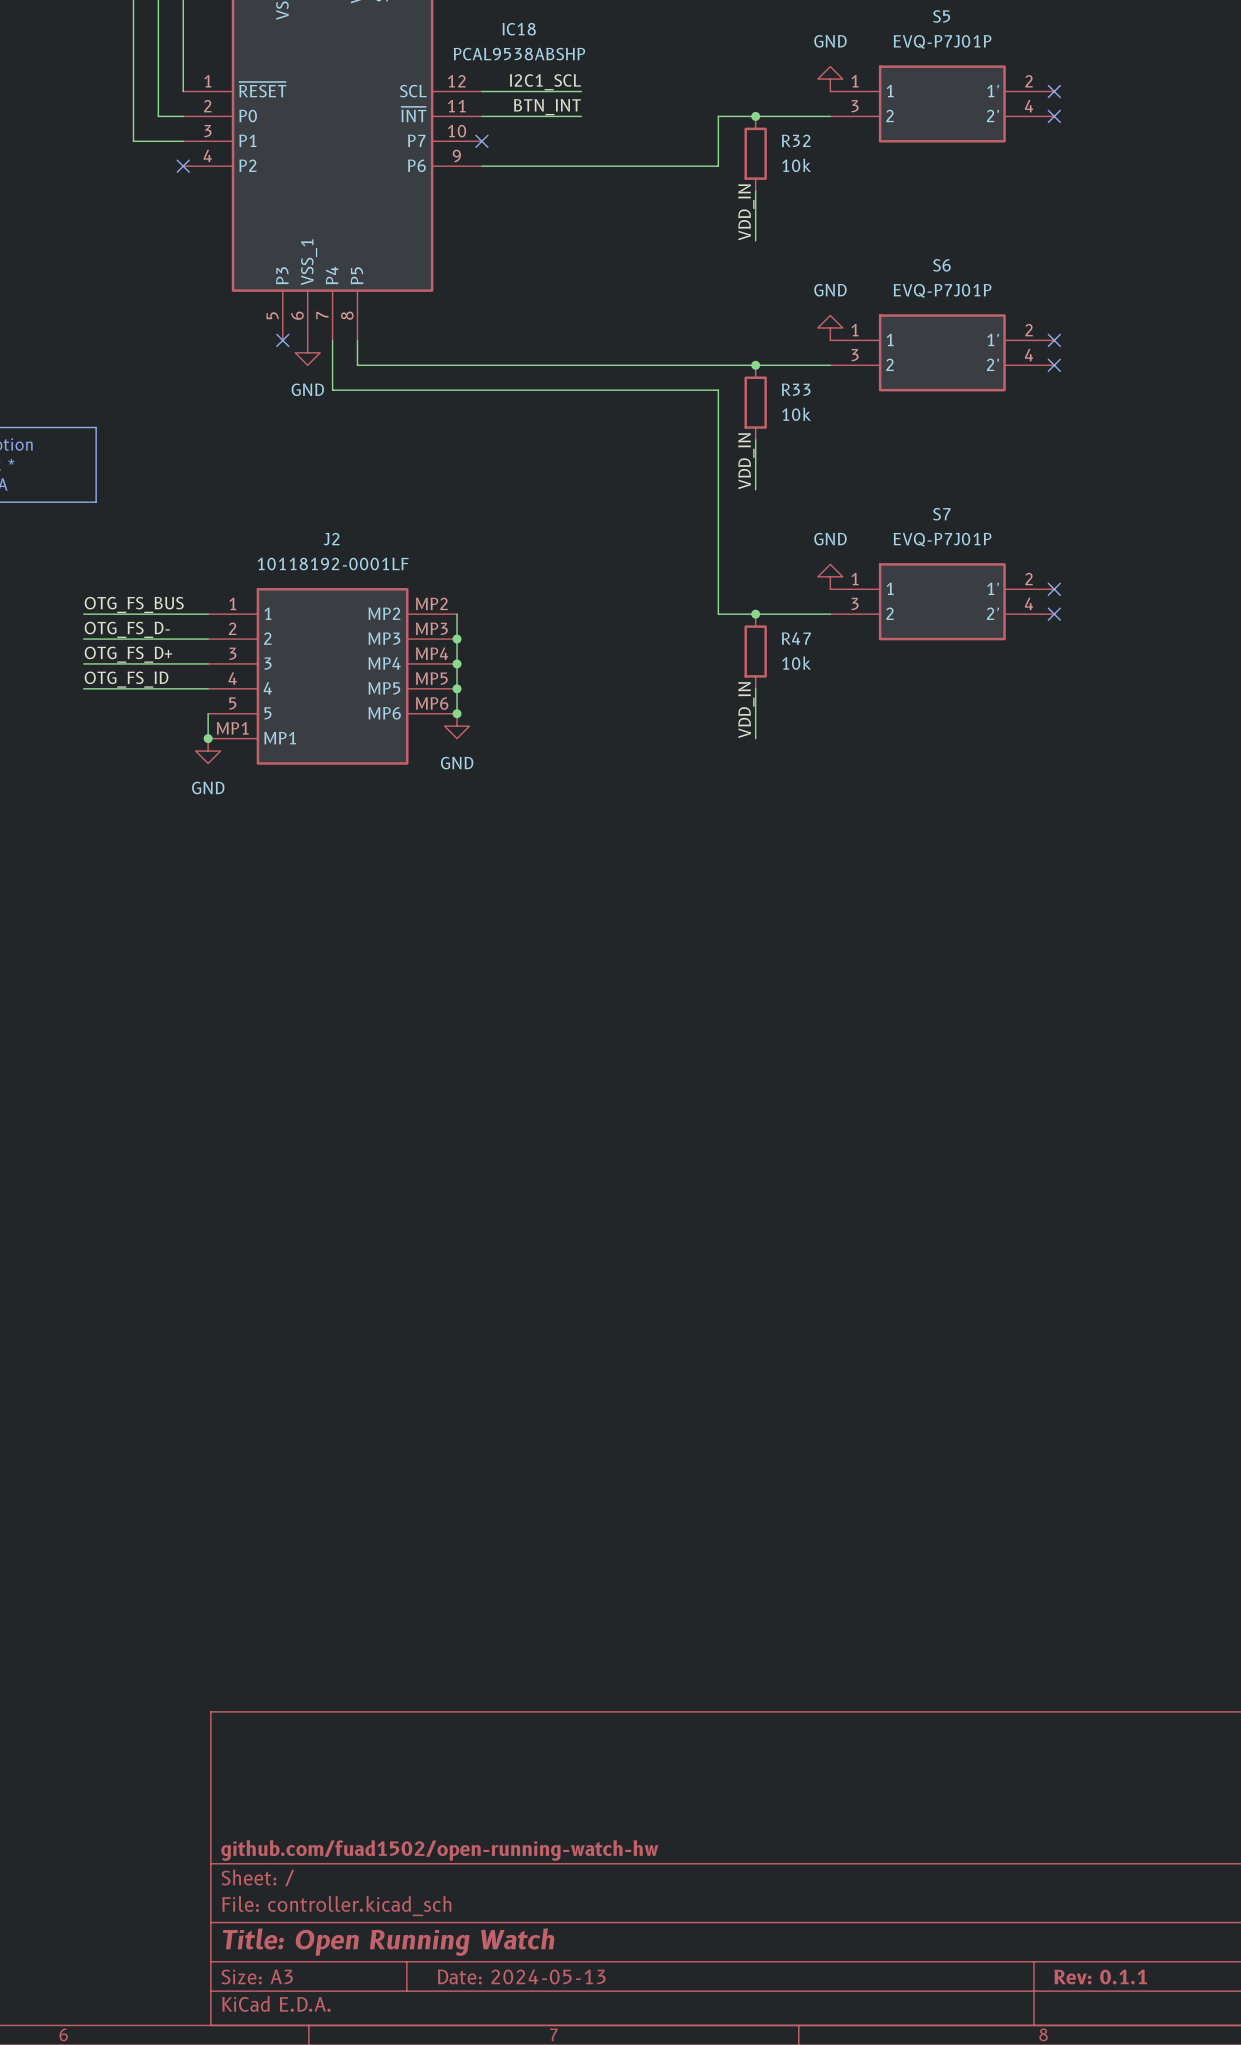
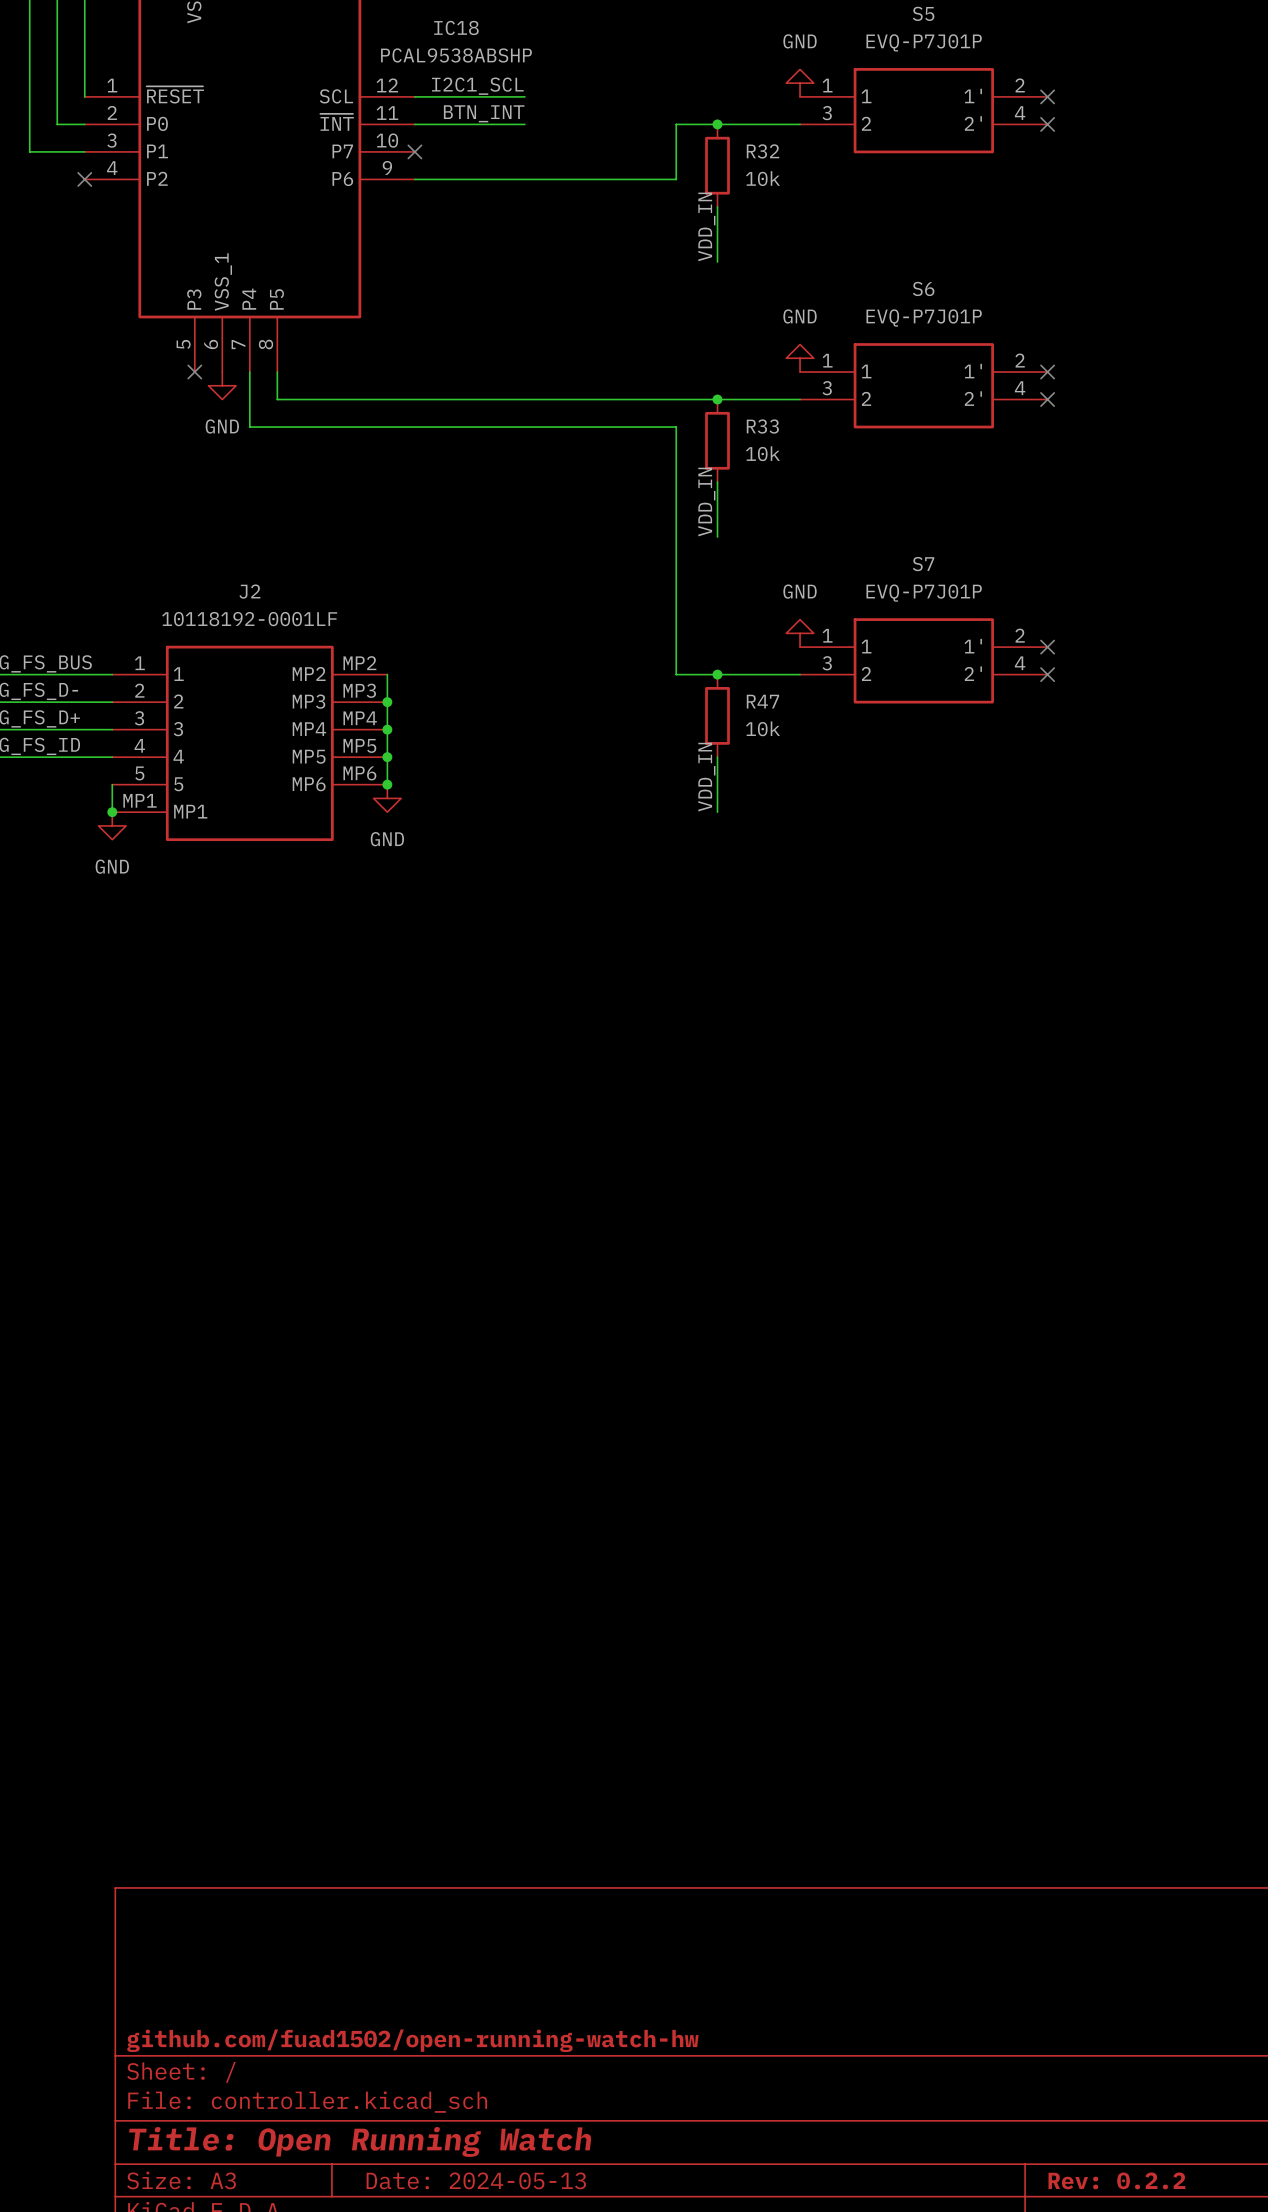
title block: Rev: 0.1.1 (1100, 1977) -> Rev: 0.2.2 (1116, 2180)

